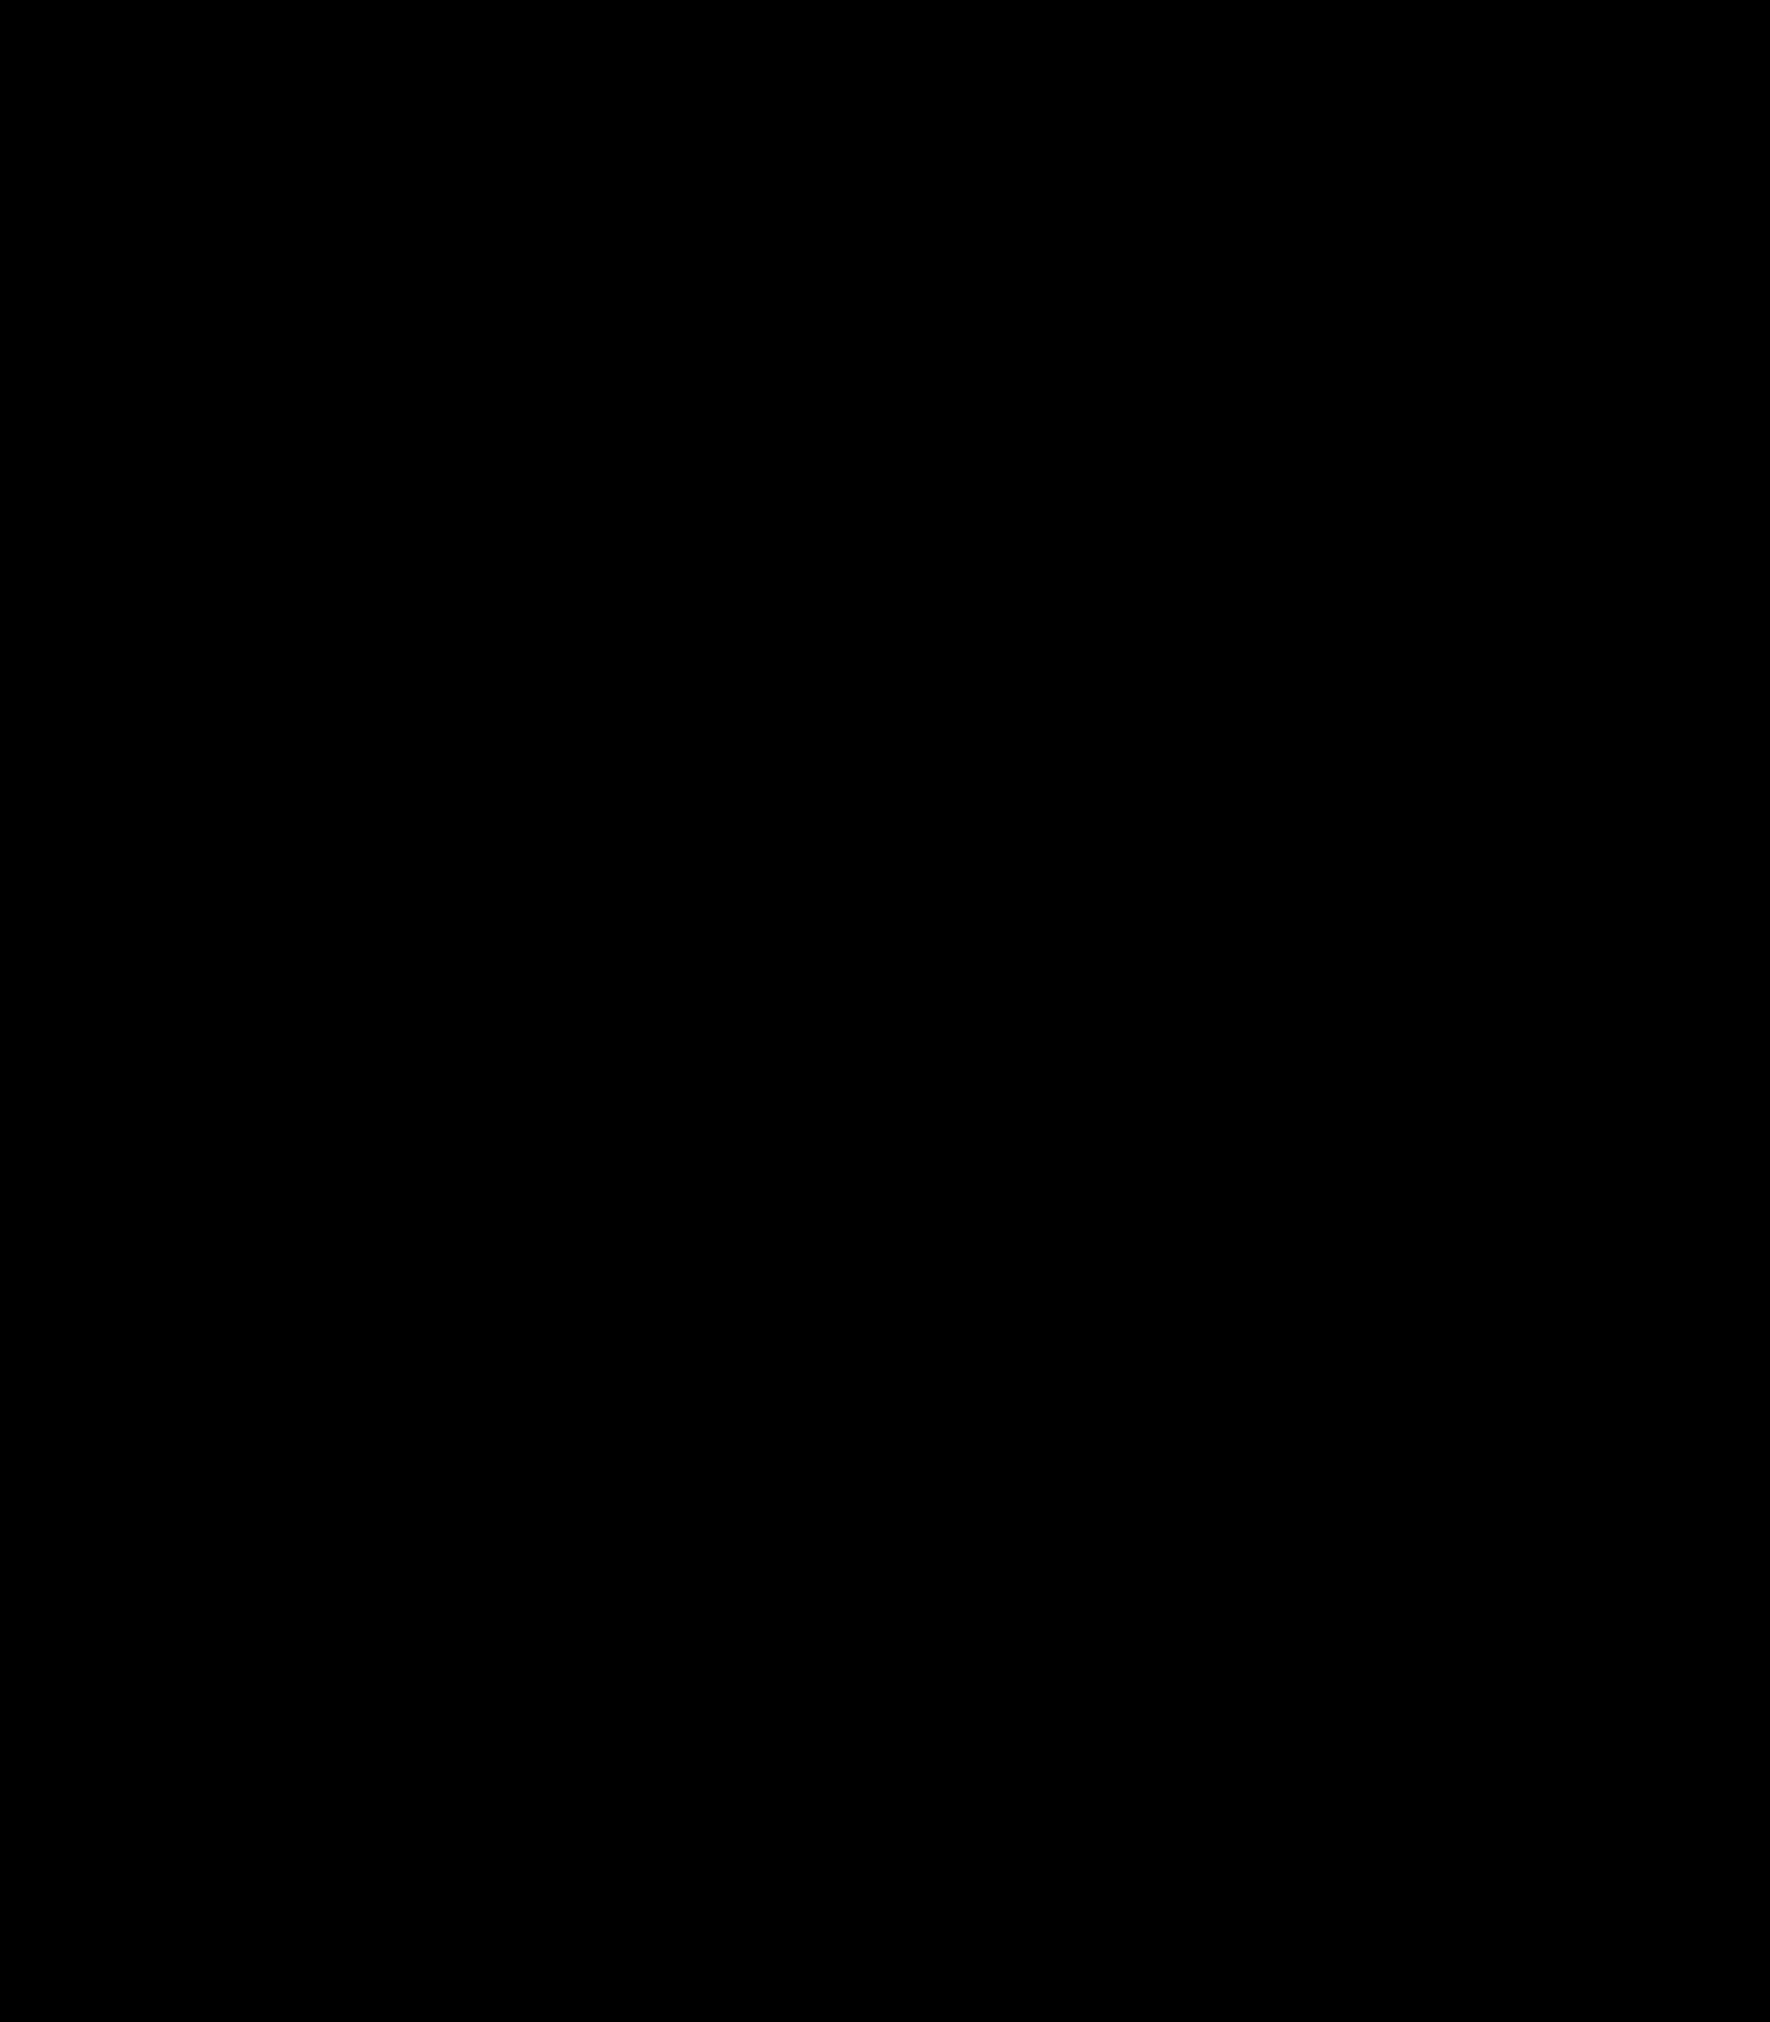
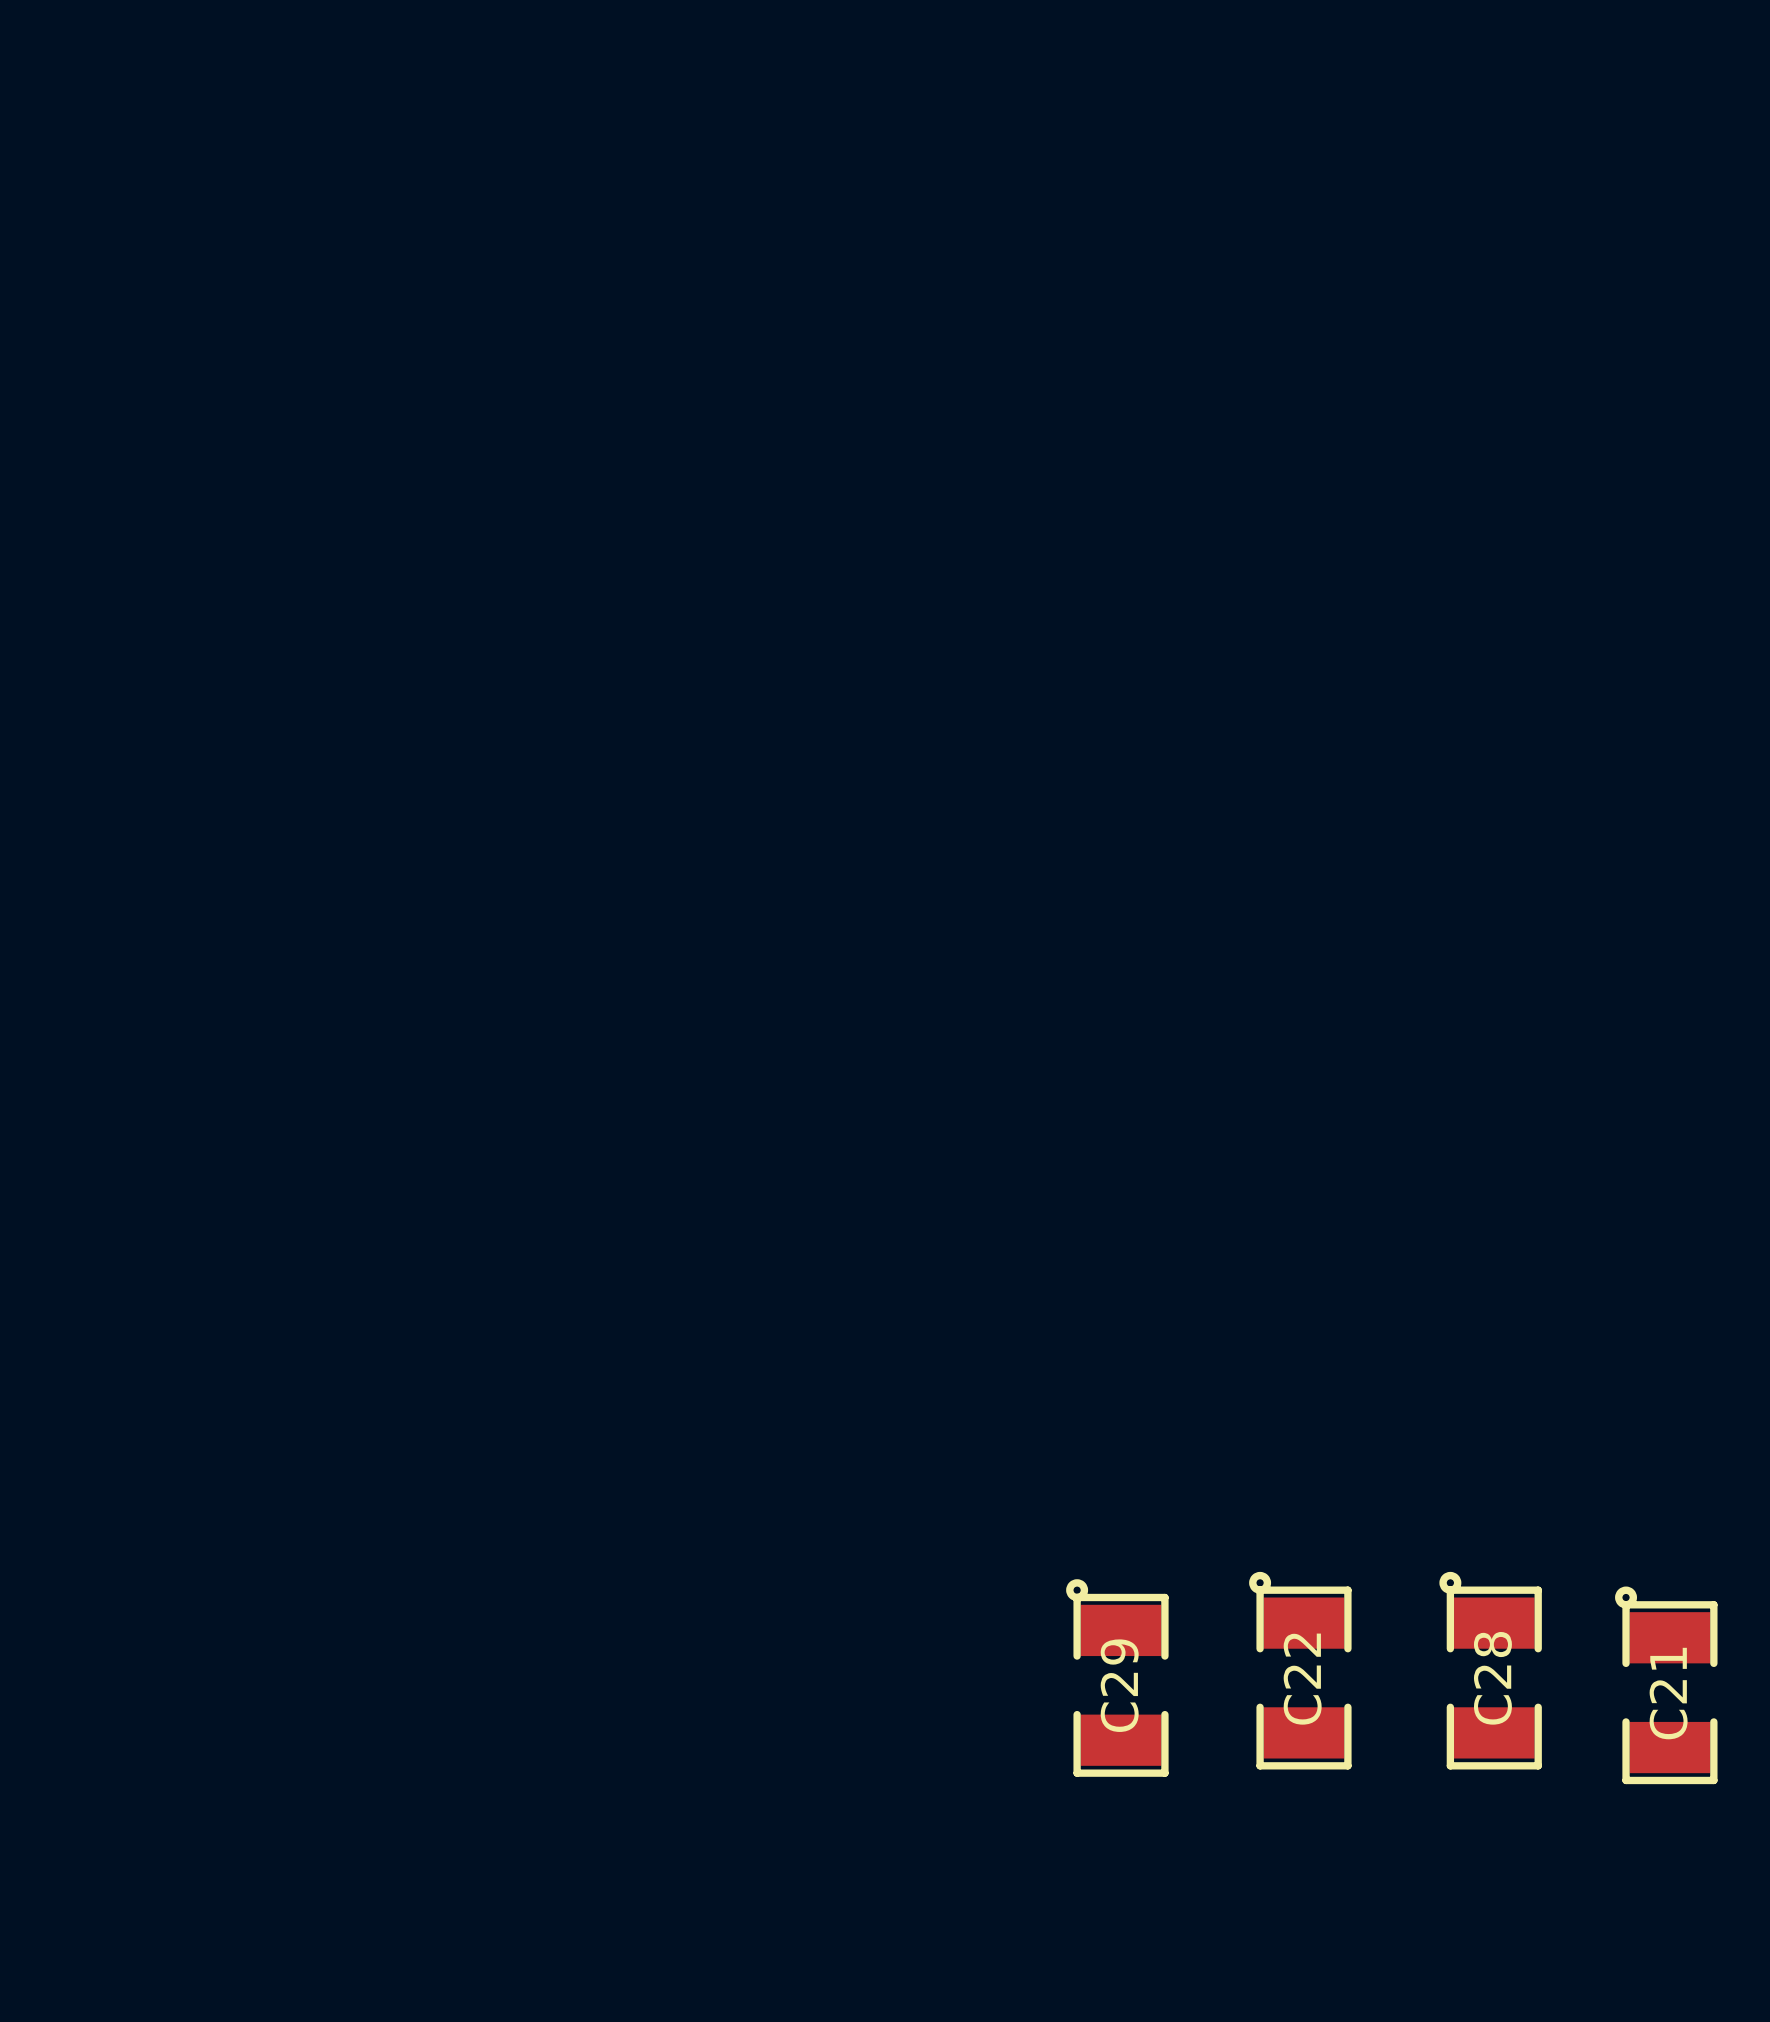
C22: none -> (1300, 1670)
C28: none -> (1490, 1670)
C29: none -> (1117, 1678)
C21: none -> (1666, 1685)

